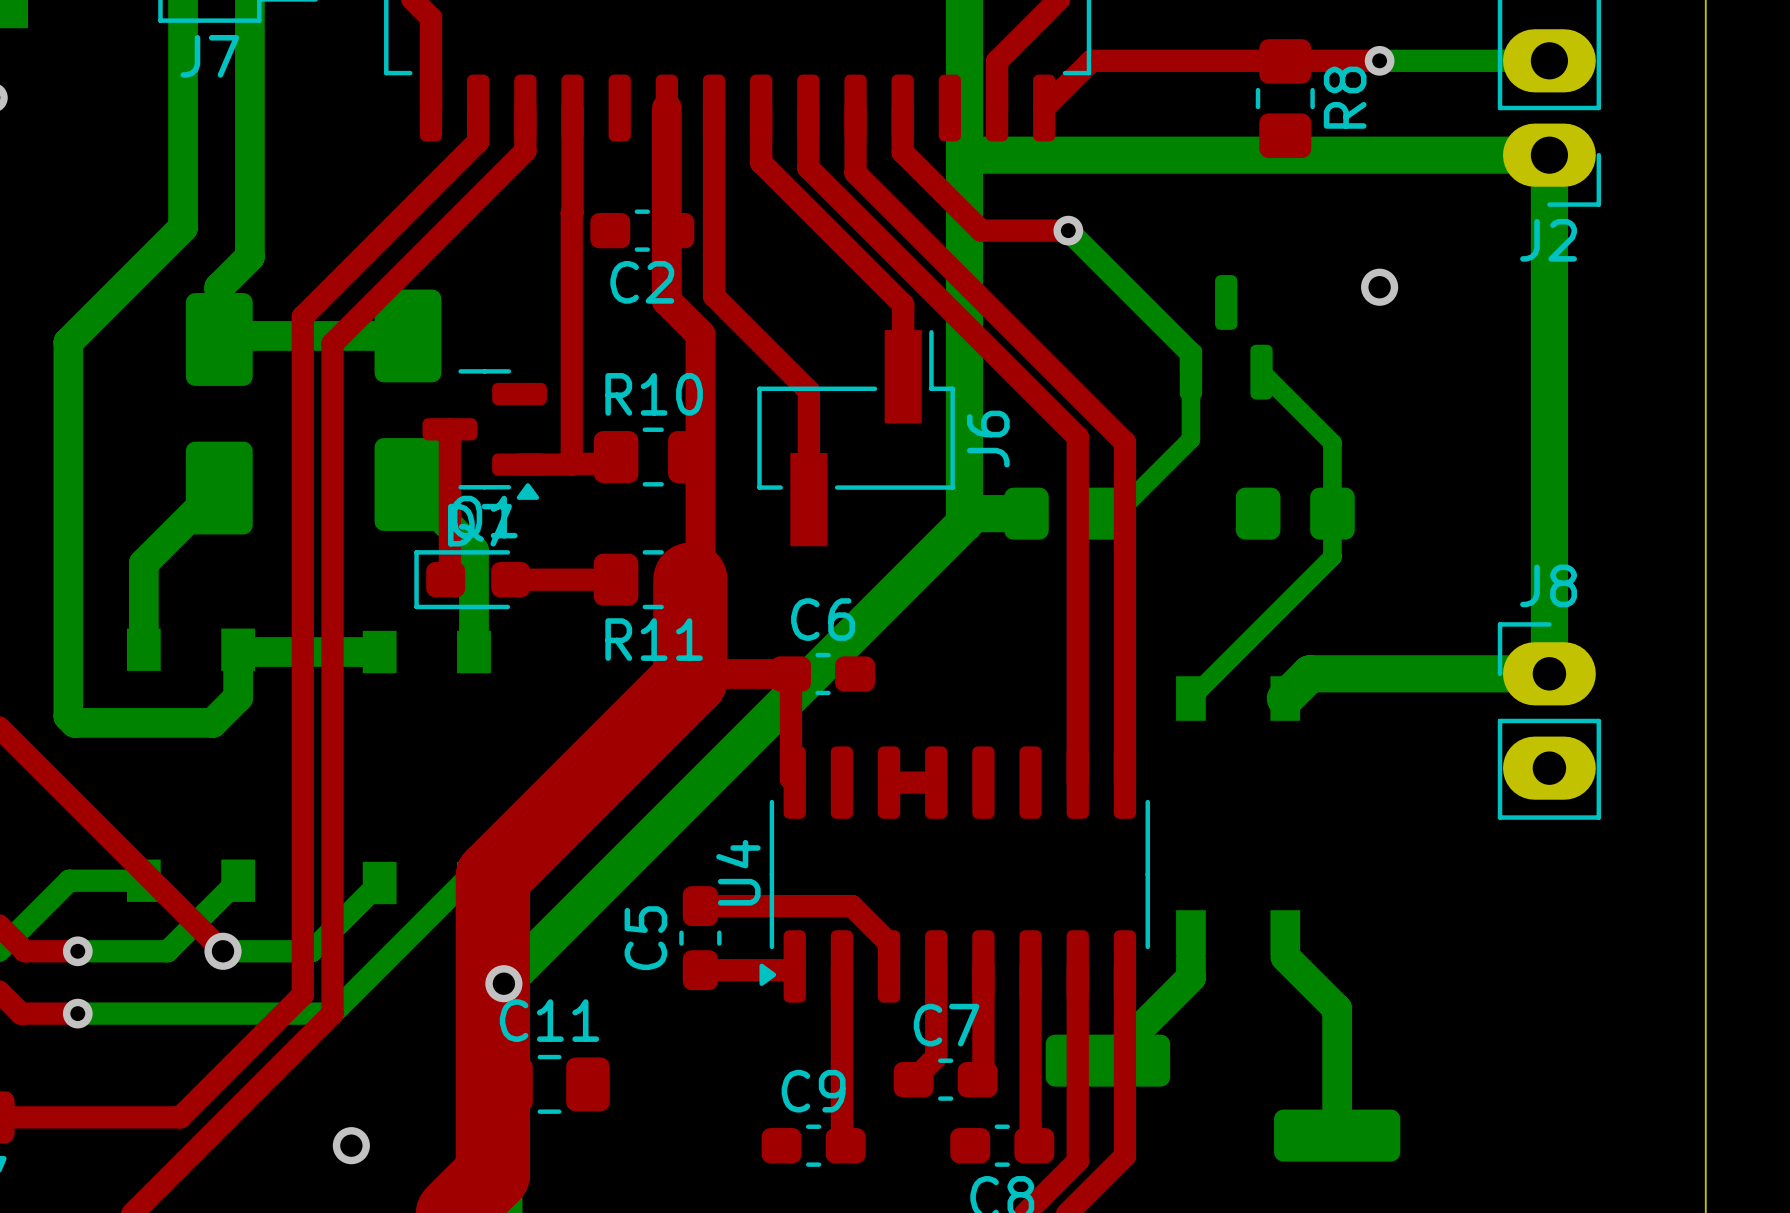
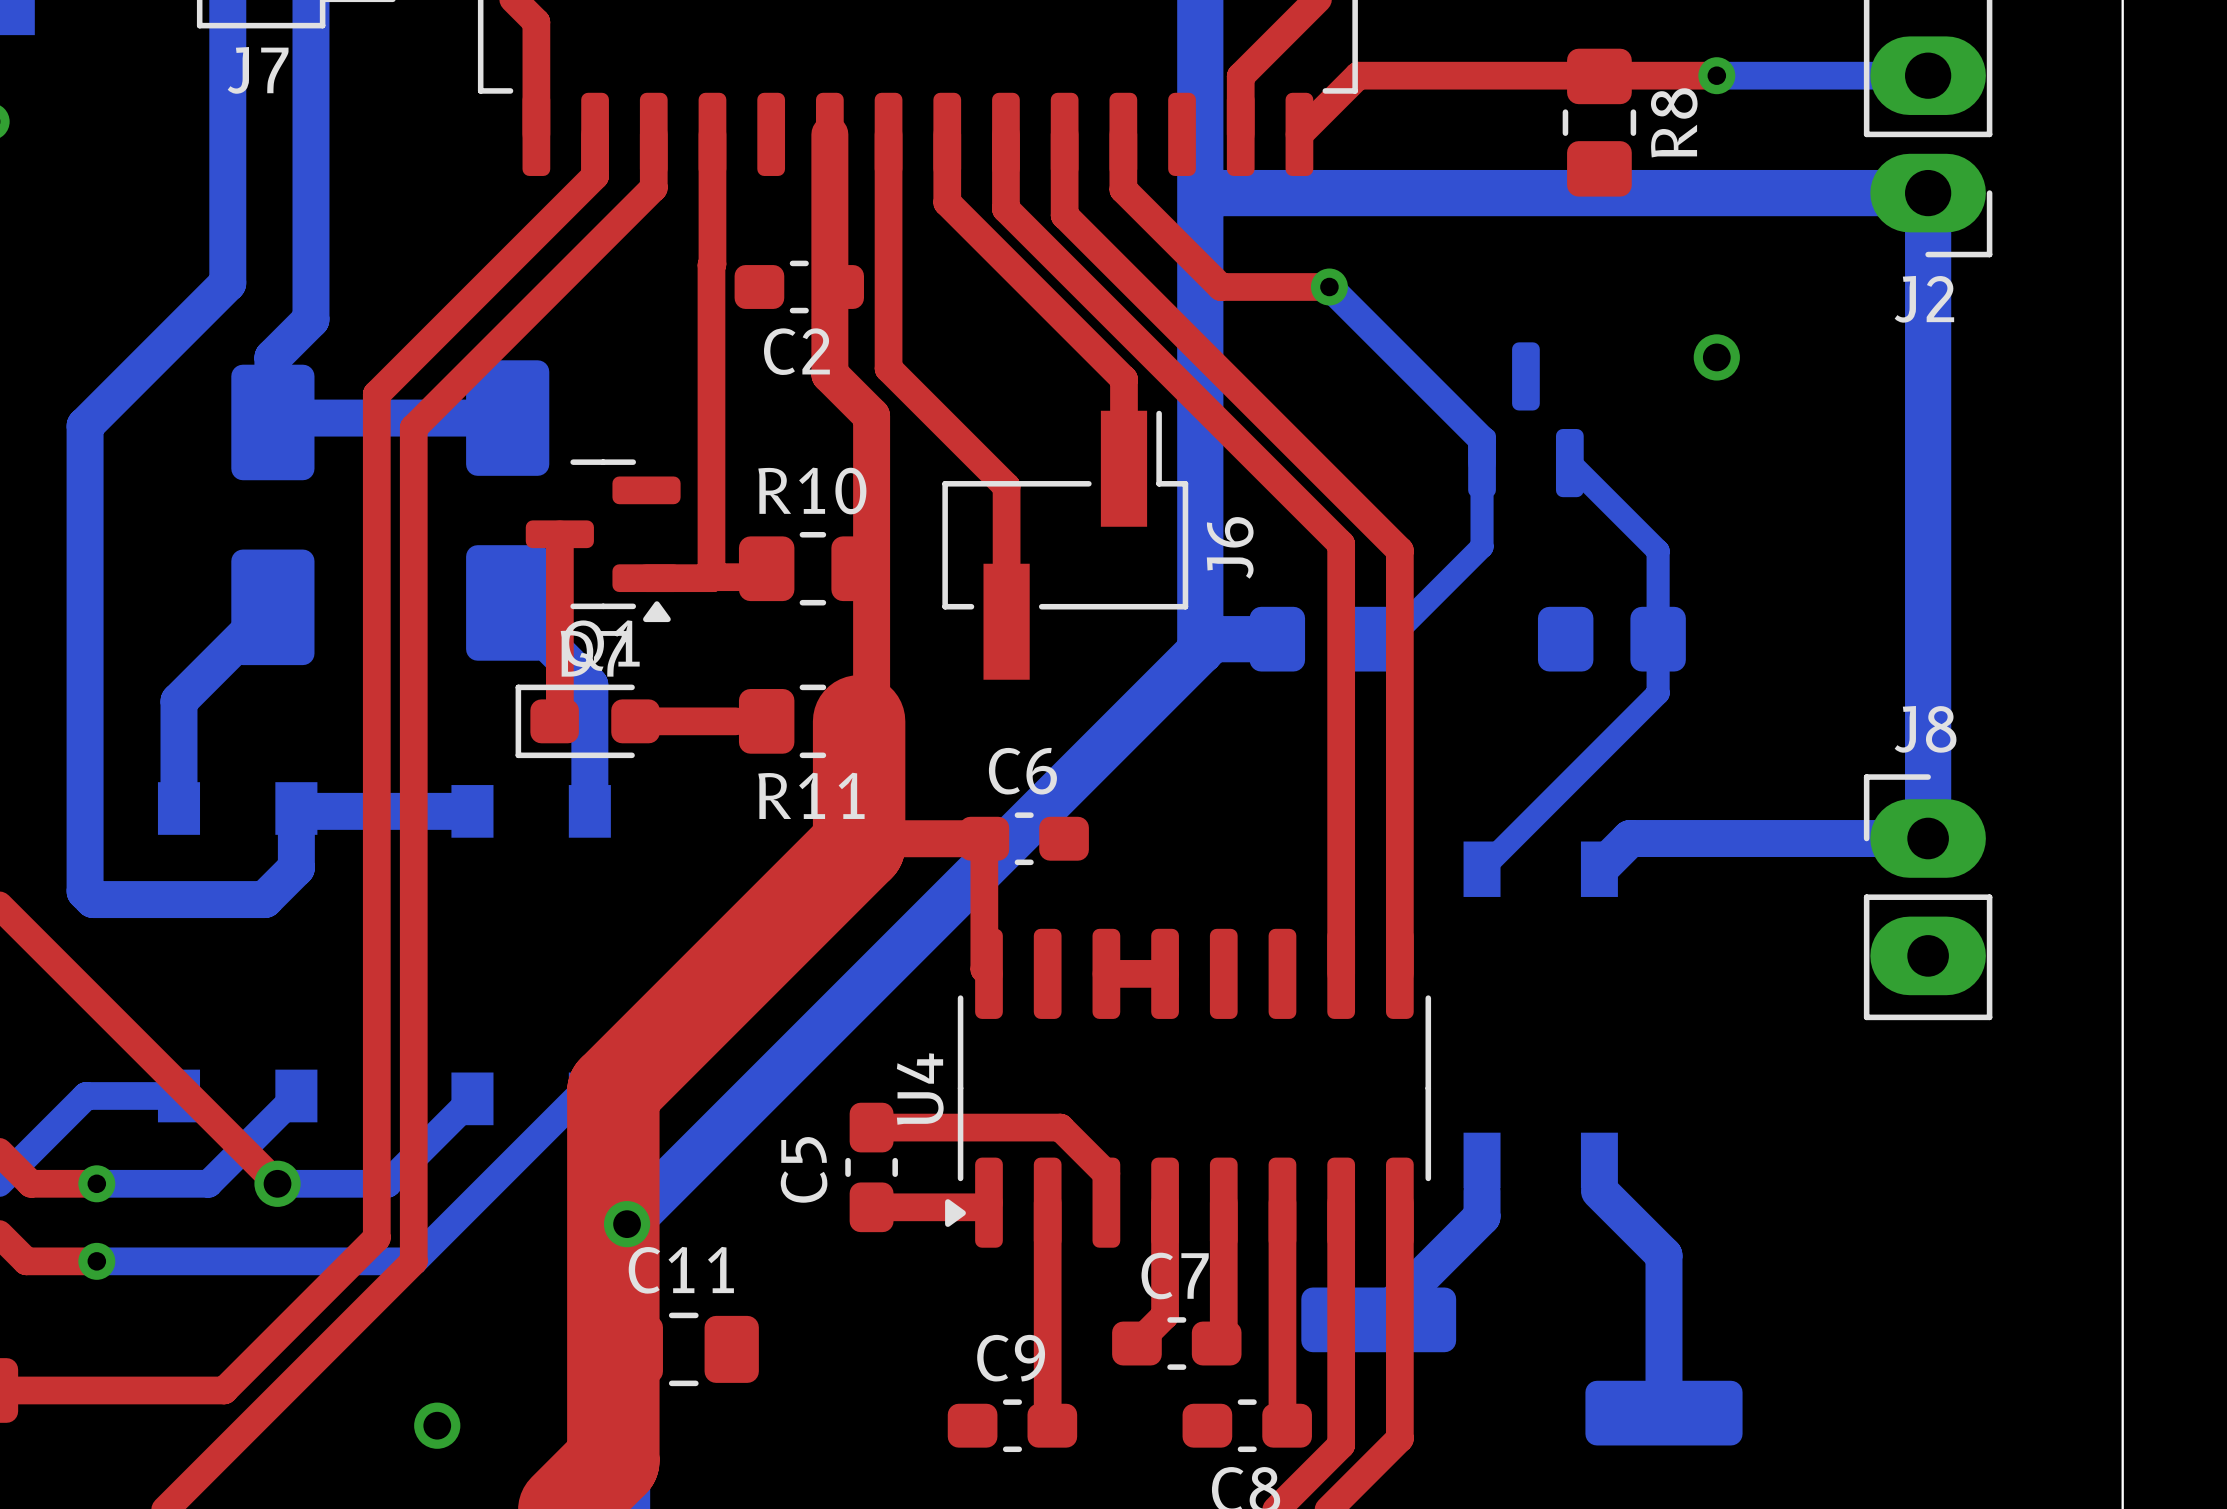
bottom track width: thick (1549, 673) (1309, 673) (1285, 698) -> thin (1928, 838) (1630, 838) (1599, 869)

